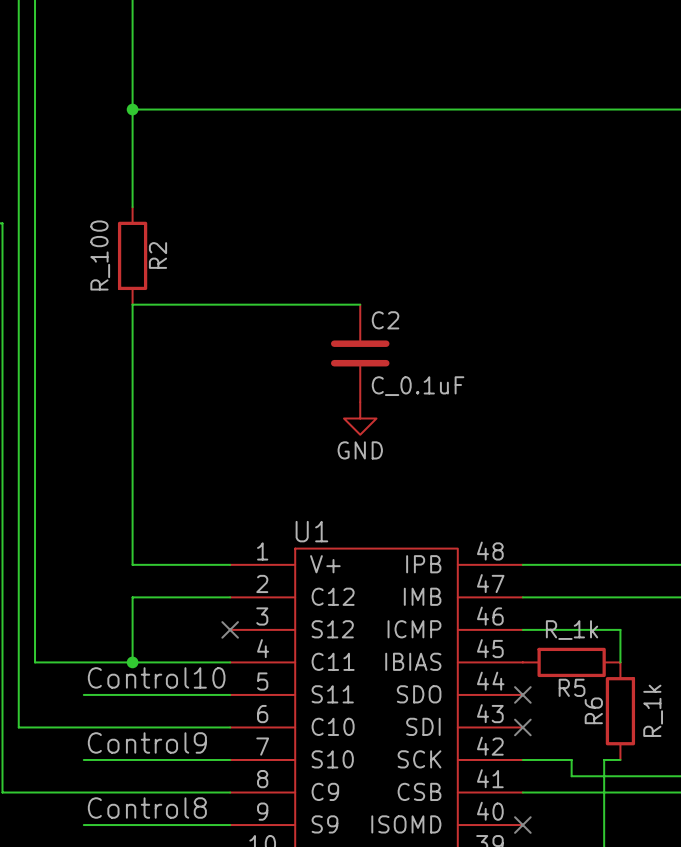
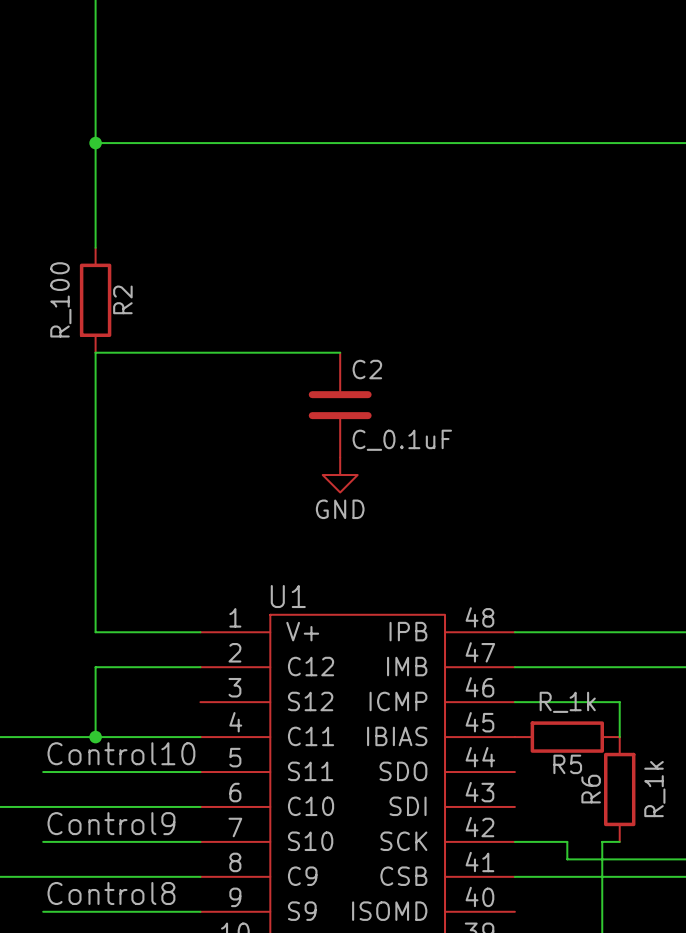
no-connect mark: (230, 629) -> none
no-connect mark: (522, 694) -> none
no-connect mark: (522, 727) -> none
no-connect mark: (522, 825) -> none

